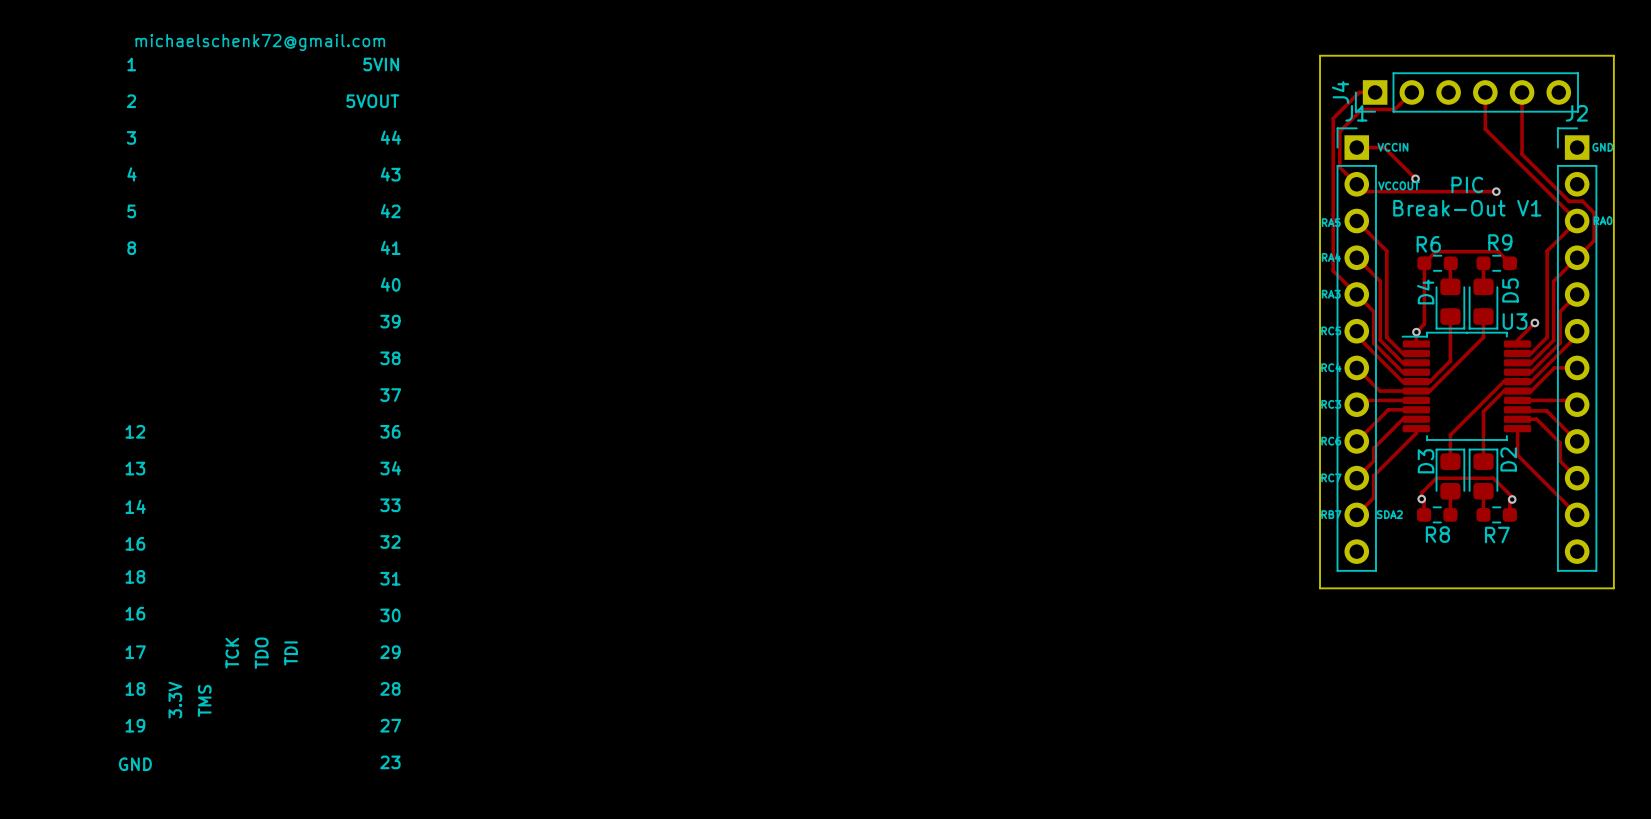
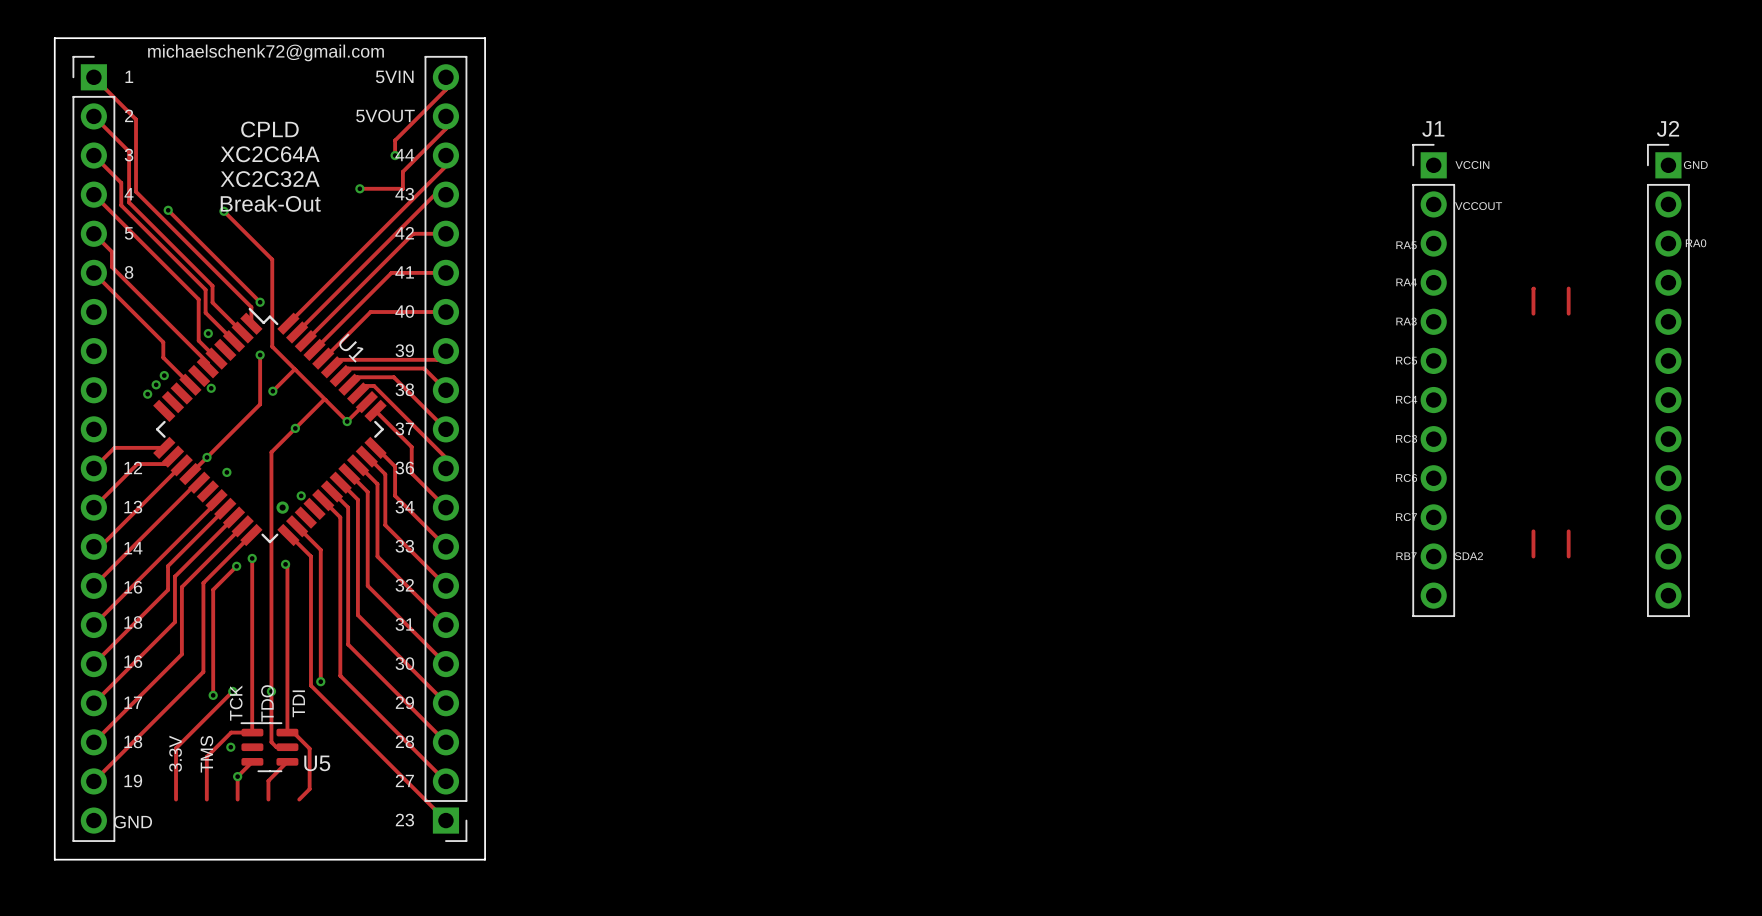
board edge: none -> (54, 38) (54, 859) (485, 859) (485, 38) (54, 38)
board edge: (1320, 55) (1320, 588) (1613, 588) (1613, 55) (1320, 55) -> none
track: none -> (93, 77) (136, 119) (136, 191) (251, 307) (251, 323)
track: none -> (445, 77) (445, 89) (395, 140) (395, 155)
track: (1375, 92) (1359, 92) (1333, 118) (1333, 270) (1373, 311) (1373, 343) (1402, 372) (1416, 372) -> none
track: (1411, 92) (1394, 109) (1361, 109) (1339, 131) (1339, 167) (1364, 191) (1496, 191) -> none
J4: (1466, 92) -> none
track: (1485, 92) (1485, 129) (1577, 221) (1547, 251) (1547, 337) (1531, 353) (1517, 353) -> none
track: (1522, 92) (1522, 154) (1568, 201) (1582, 201) (1594, 212) (1594, 240) (1553, 281) (1553, 340) (1531, 362) (1517, 362) -> none
track: none -> (93, 116) (129, 151) (129, 202) (212, 285) (212, 302) (242, 332)
track: none -> (445, 116) (445, 128) (402, 171) (402, 188) (359, 188)
text: none -> CPLD (269, 129)
text: none -> XC2C64A (270, 154)
track: none -> (93, 155) (121, 182) (121, 205) (205, 289) (205, 312) (233, 341)
via: none -> (395, 155)
track: none -> (445, 155) (445, 166) (288, 323)
track: (1356, 147) (1384, 147) (1415, 178) -> none
text: none -> XC2C32A (270, 179)
via: none -> (359, 188)
track: none -> (93, 194) (198, 299) (198, 340) (216, 358)
track: none -> (445, 194) (434, 194) (297, 332)
via: (1415, 178) -> none
text: none -> Break-Out (270, 203)
text: PIC (1467, 184) -> none
track: none -> (168, 210) (260, 302)
via: none -> (168, 210)
track: none -> (223, 211) (272, 259) (272, 346) (347, 421) (366, 402)
via: none -> (223, 211)
via: (1496, 191) -> none
text: Break-Out V1 (1467, 208) -> none
track: none -> (93, 233) (111, 251) (111, 267) (207, 362) (207, 367)
track: none -> (445, 233) (413, 233) (305, 341)
track: (1356, 221) (1386, 251) (1386, 337) (1402, 353) (1416, 353) -> none
track: none -> (93, 272) (163, 342) (163, 357) (190, 384)
track: none -> (445, 272) (391, 272) (314, 349)
track: (1356, 257) (1380, 281) (1380, 340) (1402, 362) (1416, 362) -> none
R6: (1437, 263) -> none
R9: (1496, 263) -> none
track: (1509, 263) (1498, 251) (1435, 251) (1424, 263) (1424, 324) (1416, 332) (1416, 344) -> none
via: none -> (260, 302)
track: none -> (445, 312) (370, 312) (323, 358)
track: (1577, 294) (1560, 311) (1560, 343) (1531, 372) (1517, 372) -> none
D4: (1450, 304) -> none
D5: (1483, 304) -> none
via: none -> (208, 333)
track: (1450, 316) (1450, 361) (1429, 381) (1402, 381) (1356, 335) (1356, 331) -> none
track: (1483, 316) (1483, 337) (1429, 391) (1379, 391) (1356, 367) -> none
track: none -> (445, 351) (437, 359) (339, 359) (331, 367)
track: (1534, 322) (1517, 340) (1517, 344) -> none
via: (1534, 322) -> none
track: none -> (260, 355) (260, 404) (190, 474)
via: none -> (260, 355)
track: (1577, 331) (1577, 335) (1531, 381) (1503, 381) (1450, 435) (1450, 461) -> none
via: (1416, 332) -> none
track: none -> (295, 369) (272, 391)
via: none -> (164, 375)
track: none -> (340, 376) (348, 368) (424, 368) (445, 390)
via: none -> (156, 384)
track: none -> (349, 384) (357, 377) (393, 377) (445, 429)
via: none -> (211, 388)
via: none -> (272, 391)
track: none -> (358, 393) (365, 385) (374, 385) (445, 457) (445, 468)
via: none -> (147, 394)
track: none -> (325, 400) (271, 452) (271, 742) (276, 747) (294, 747)
track: (1577, 367) (1554, 367) (1531, 391) (1504, 391) (1483, 411) (1483, 461) -> none
track: none -> (375, 410) (411, 447) (411, 473) (445, 507)
U3: (1466, 386) -> none
via: none -> (347, 421)
U1: none -> (269, 427)
via: none -> (295, 428)
track: (1416, 400) (1361, 400) (1356, 404) -> none
track: (1517, 400) (1572, 400) (1577, 404) -> none
track: (1416, 409) (1388, 409) (1356, 441) -> none
track: (1517, 409) (1546, 410) (1577, 441) -> none
track: none -> (164, 447) (114, 447) (93, 468)
track: none -> (375, 447) (395, 466) (395, 495) (445, 546)
part: none -> (93, 448)
part: none -> (445, 448)
track: (1416, 419) (1402, 419) (1373, 448) (1373, 461) (1356, 478) -> none
track: (1517, 419) (1536, 419) (1560, 442) (1560, 461) (1577, 478) -> none
track: none -> (172, 456) (165, 464) (137, 464) (93, 507)
via: none -> (207, 457)
track: none -> (366, 456) (385, 474) (385, 525) (445, 585)
track: (1416, 428) (1416, 433) (1373, 475) (1373, 497) (1356, 514) -> none
track: (1517, 428) (1517, 455) (1577, 514) -> none
track: none -> (181, 465) (100, 546) (93, 546)
track: none -> (358, 465) (377, 484) (377, 556) (445, 624)
via: none -> (226, 472)
track: none -> (349, 474) (367, 491) (367, 585) (445, 664)
track: none -> (199, 482) (93, 585)
track: none -> (340, 482) (357, 499) (357, 615) (445, 703)
track: none -> (331, 491) (348, 507) (348, 644) (445, 742)
via: none -> (301, 495)
track: none -> (216, 500) (93, 624)
track: none -> (323, 500) (340, 517) (340, 675) (445, 781)
via: none -> (282, 507)
track: none -> (225, 508) (168, 566) (168, 589) (93, 664)
D3: (1450, 474) -> none
D2: (1483, 474) -> none
track: none -> (233, 517) (174, 576) (174, 622) (93, 703)
track: none -> (242, 526) (181, 587) (181, 654) (93, 742)
track: none -> (297, 526) (320, 549) (320, 681)
track: none -> (251, 535) (203, 582) (203, 671) (93, 781)
track: none -> (288, 535) (310, 556) (310, 685) (445, 820)
via: (1421, 499) -> none
via: (1512, 499) -> none
track: (1424, 514) (1421, 492) (1436, 478) (1493, 478) (1512, 497) (1509, 501) (1509, 514) -> none
R8: (1437, 514) -> none
R7: (1496, 514) -> none
track: none -> (252, 558) (252, 732)
via: none -> (252, 558)
track: none -> (285, 564) (287, 566) (287, 732) (293, 732) (309, 748) (309, 789) (299, 799)
via: none -> (285, 564)
track: none -> (236, 566) (213, 589) (213, 695)
via: none -> (236, 566)
via: none -> (320, 681)
track: none -> (232, 691) (176, 748) (176, 799)
via: none -> (232, 691)
via: none -> (271, 691)
via: none -> (213, 695)
track: none -> (252, 732) (231, 732) (206, 756) (206, 799)
via: none -> (230, 747)
U5: none -> (269, 747)
track: none -> (252, 761) (237, 776) (237, 799)
track: none -> (287, 761) (268, 780) (268, 799)
via: none -> (237, 776)

